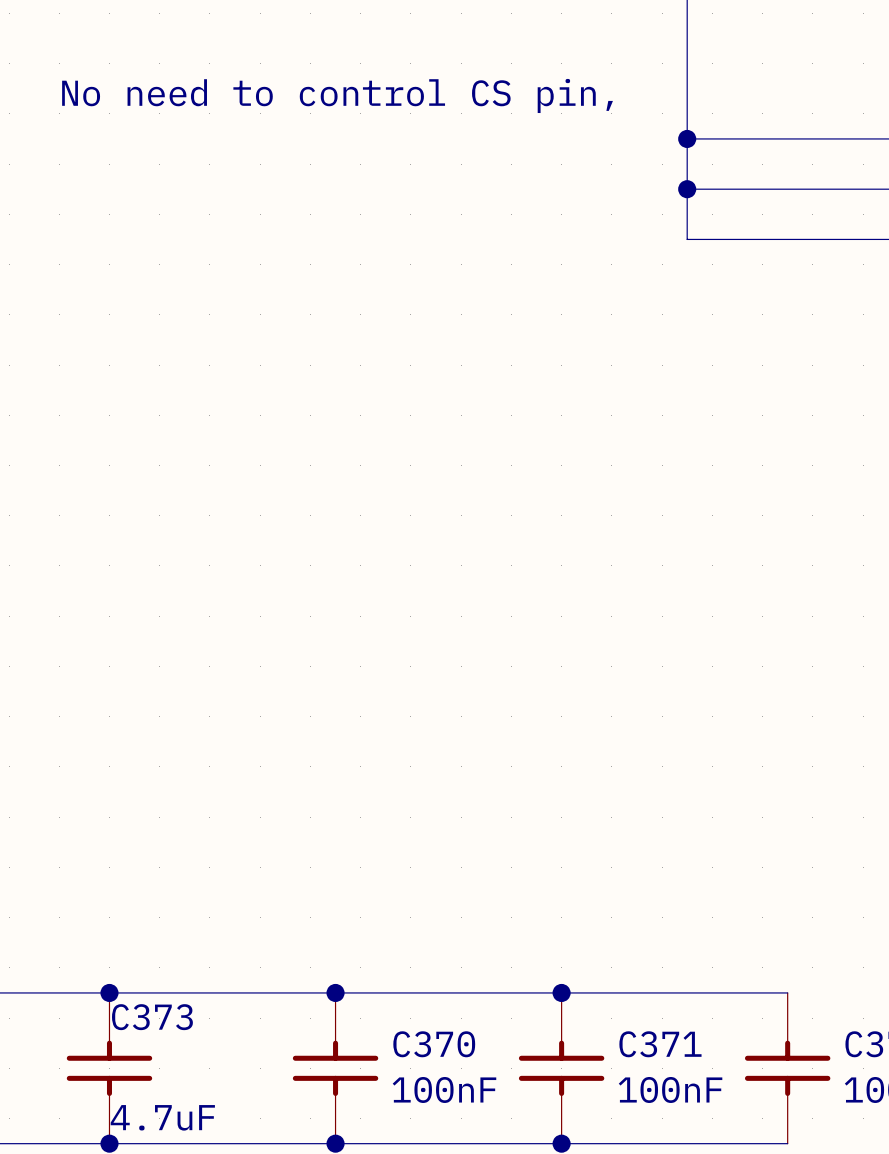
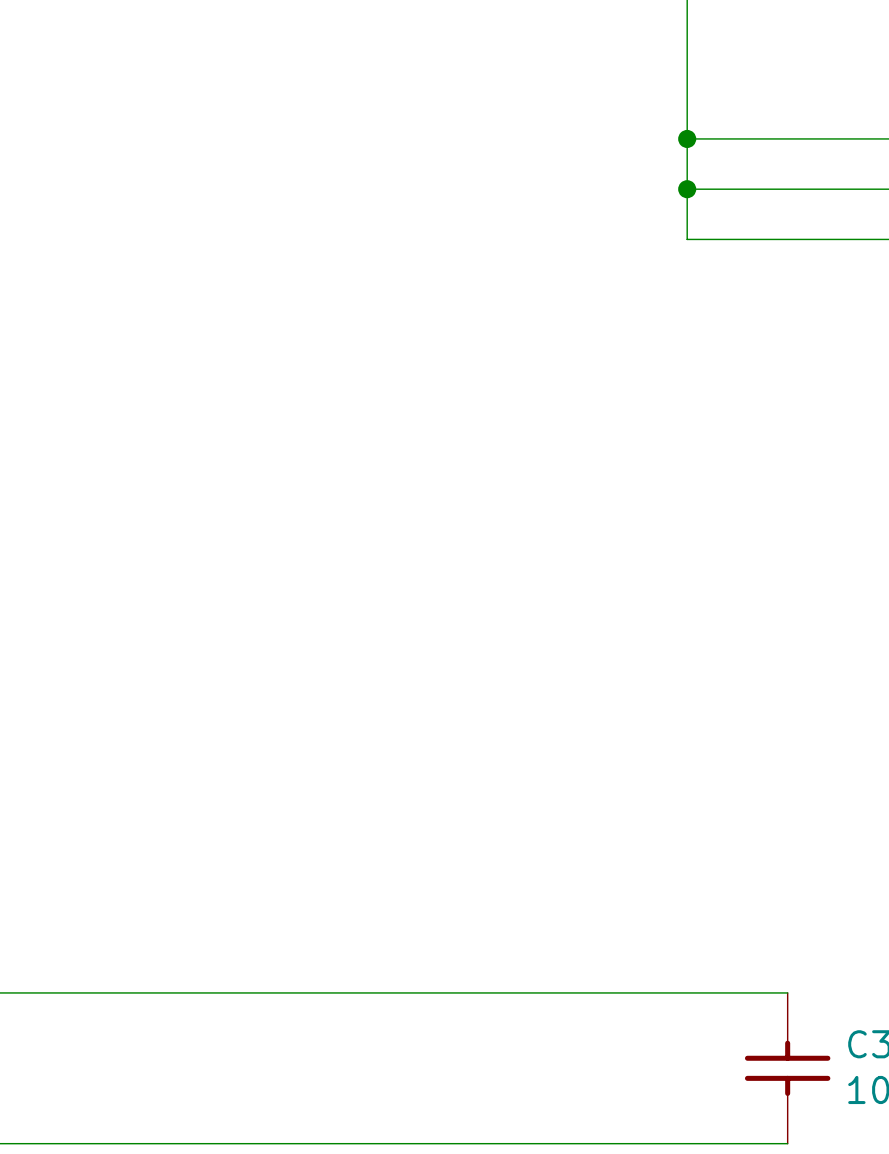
text: No need to control CS pin, (337, 95) -> none
junction: (109, 992) -> none
junction: (335, 992) -> none
junction: (561, 992) -> none
C373: (109, 1068) -> none
C370: (335, 1068) -> none
C371: (561, 1068) -> none
junction: (109, 1143) -> none
junction: (335, 1143) -> none
junction: (561, 1143) -> none

